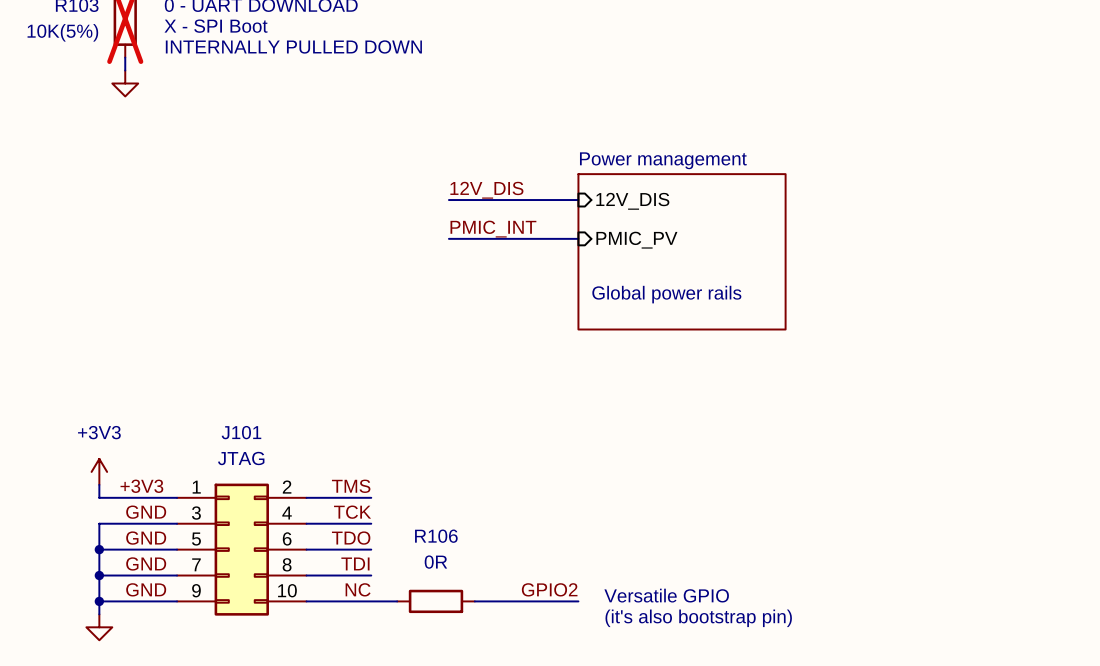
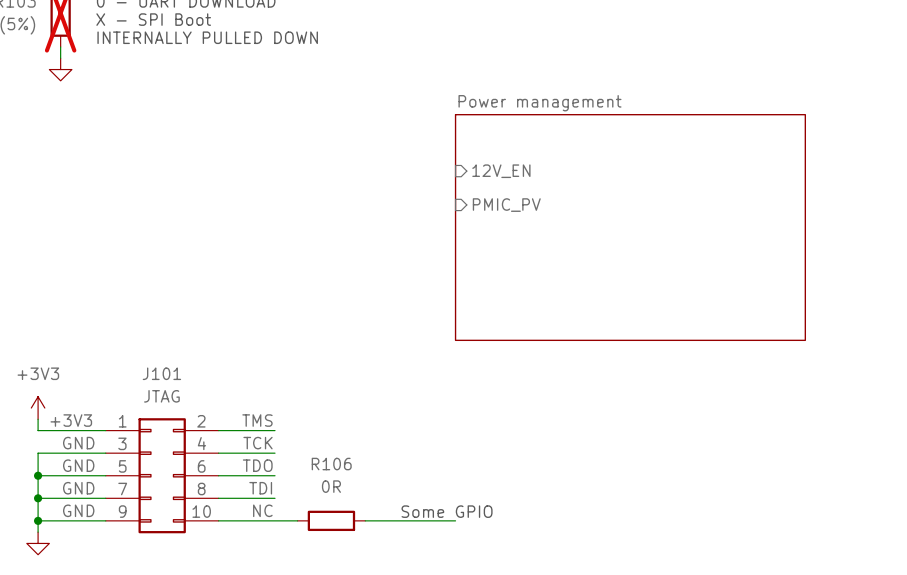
label: 12V_DIS (486, 190) -> none
wire: (448, 200) (578, 200) -> none
sheet pin: 12V_DIS (632, 201) -> 12V_EN (501, 171)
label: PMIC_INT (493, 229) -> none
wire: (448, 238) (578, 238) -> none
sheet Power management: (682, 251) -> none
sheet Power management: none -> (630, 227)
text: Global power rails (666, 294) -> none
label: GPIO2 (549, 589) -> none
text: none -> Some GPIO (447, 511)
text: Versatile GPIO (666, 595) -> none
text: (it's also bootstrap pin) (698, 618) -> none

